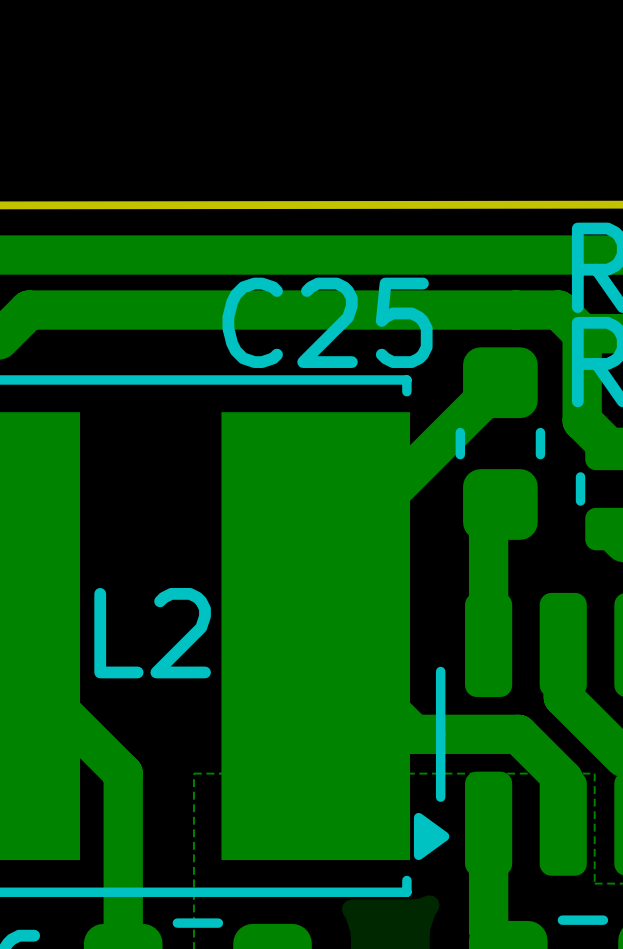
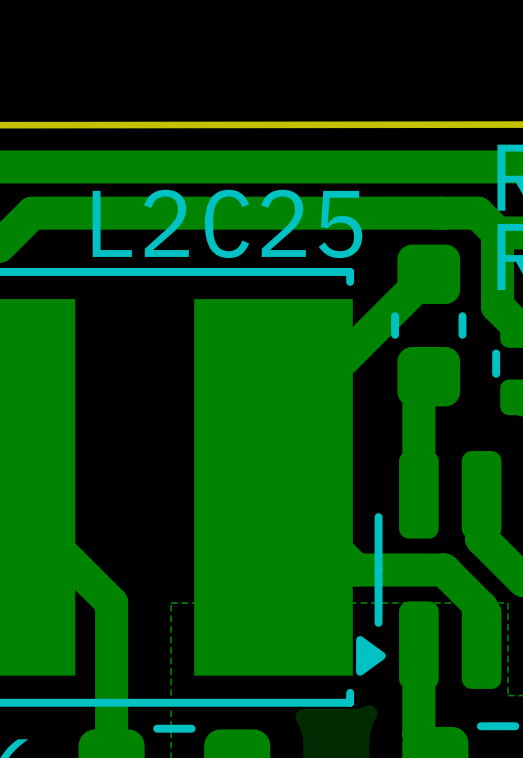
L2 name position: L2 (152, 633) -> L2 (140, 223)

